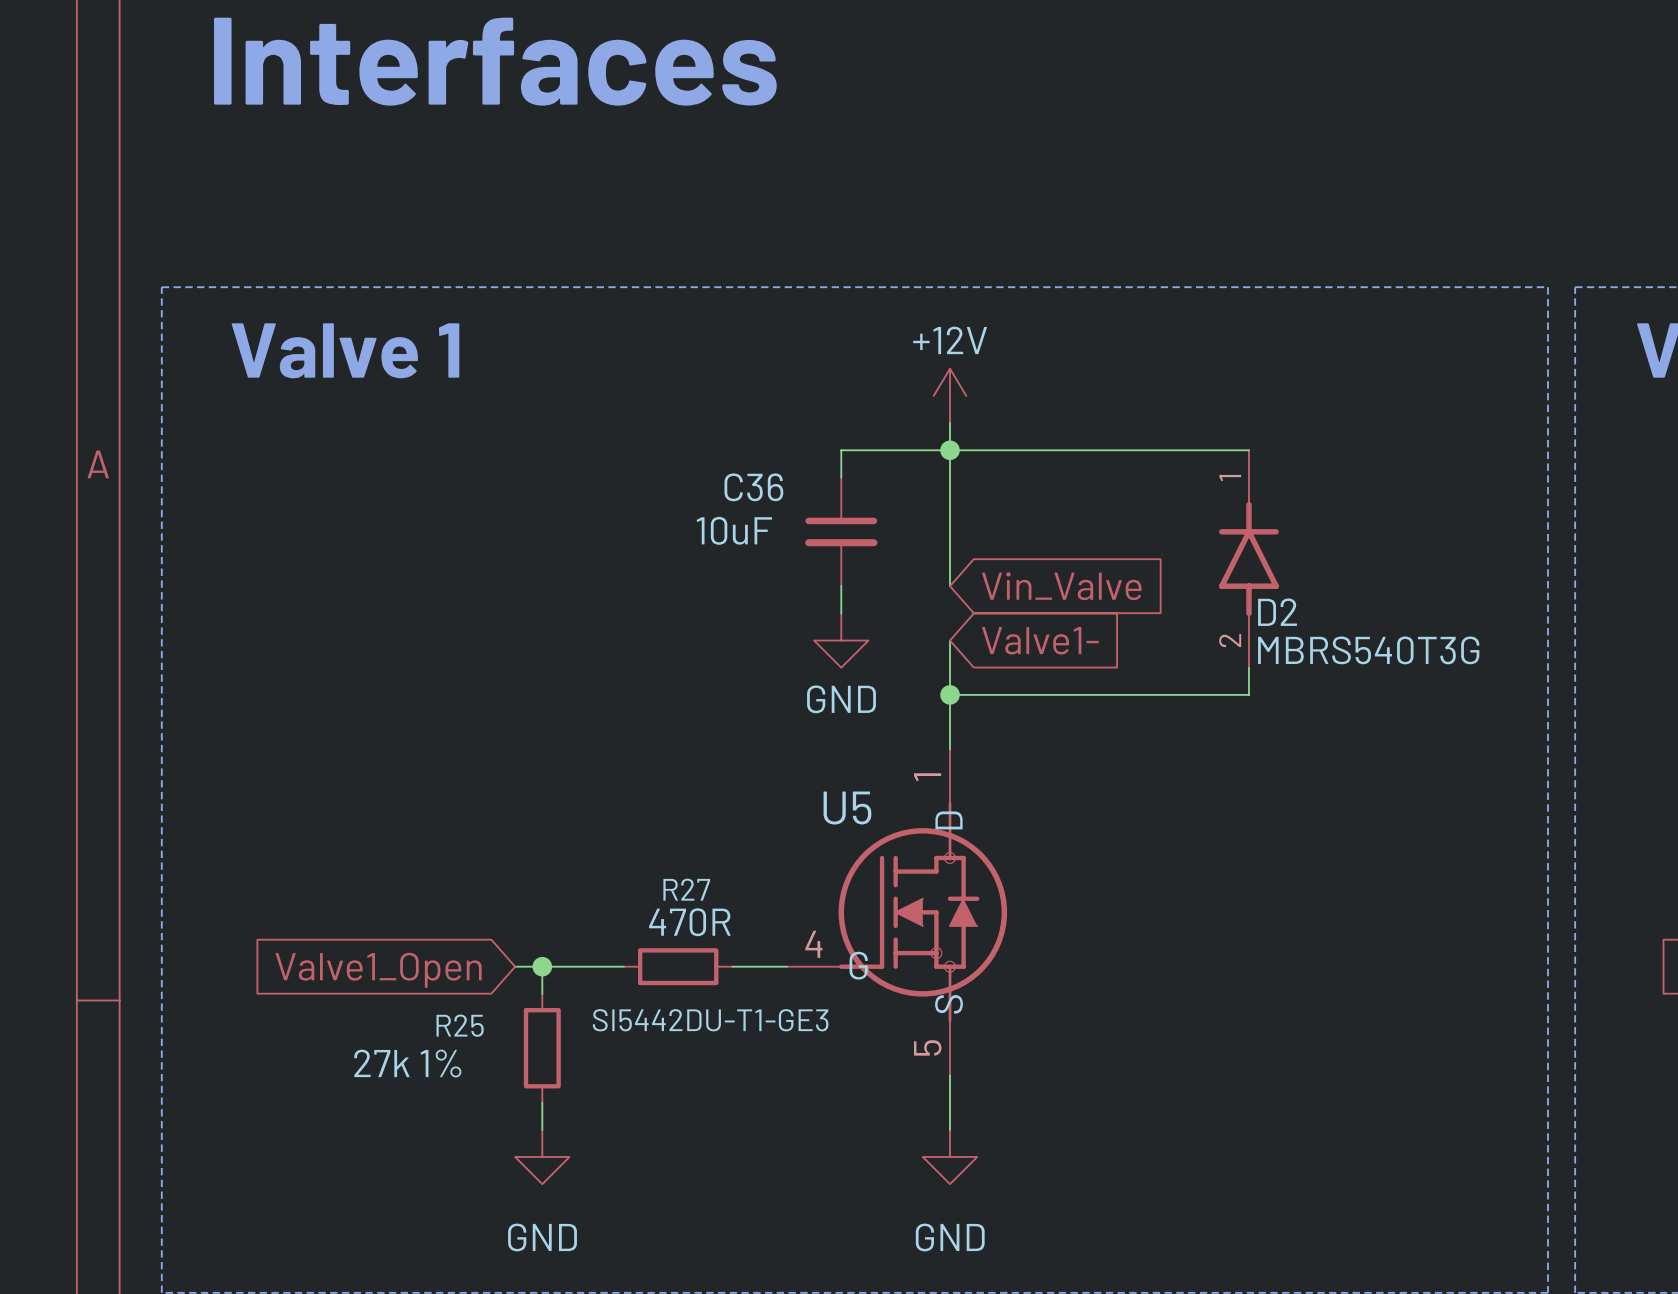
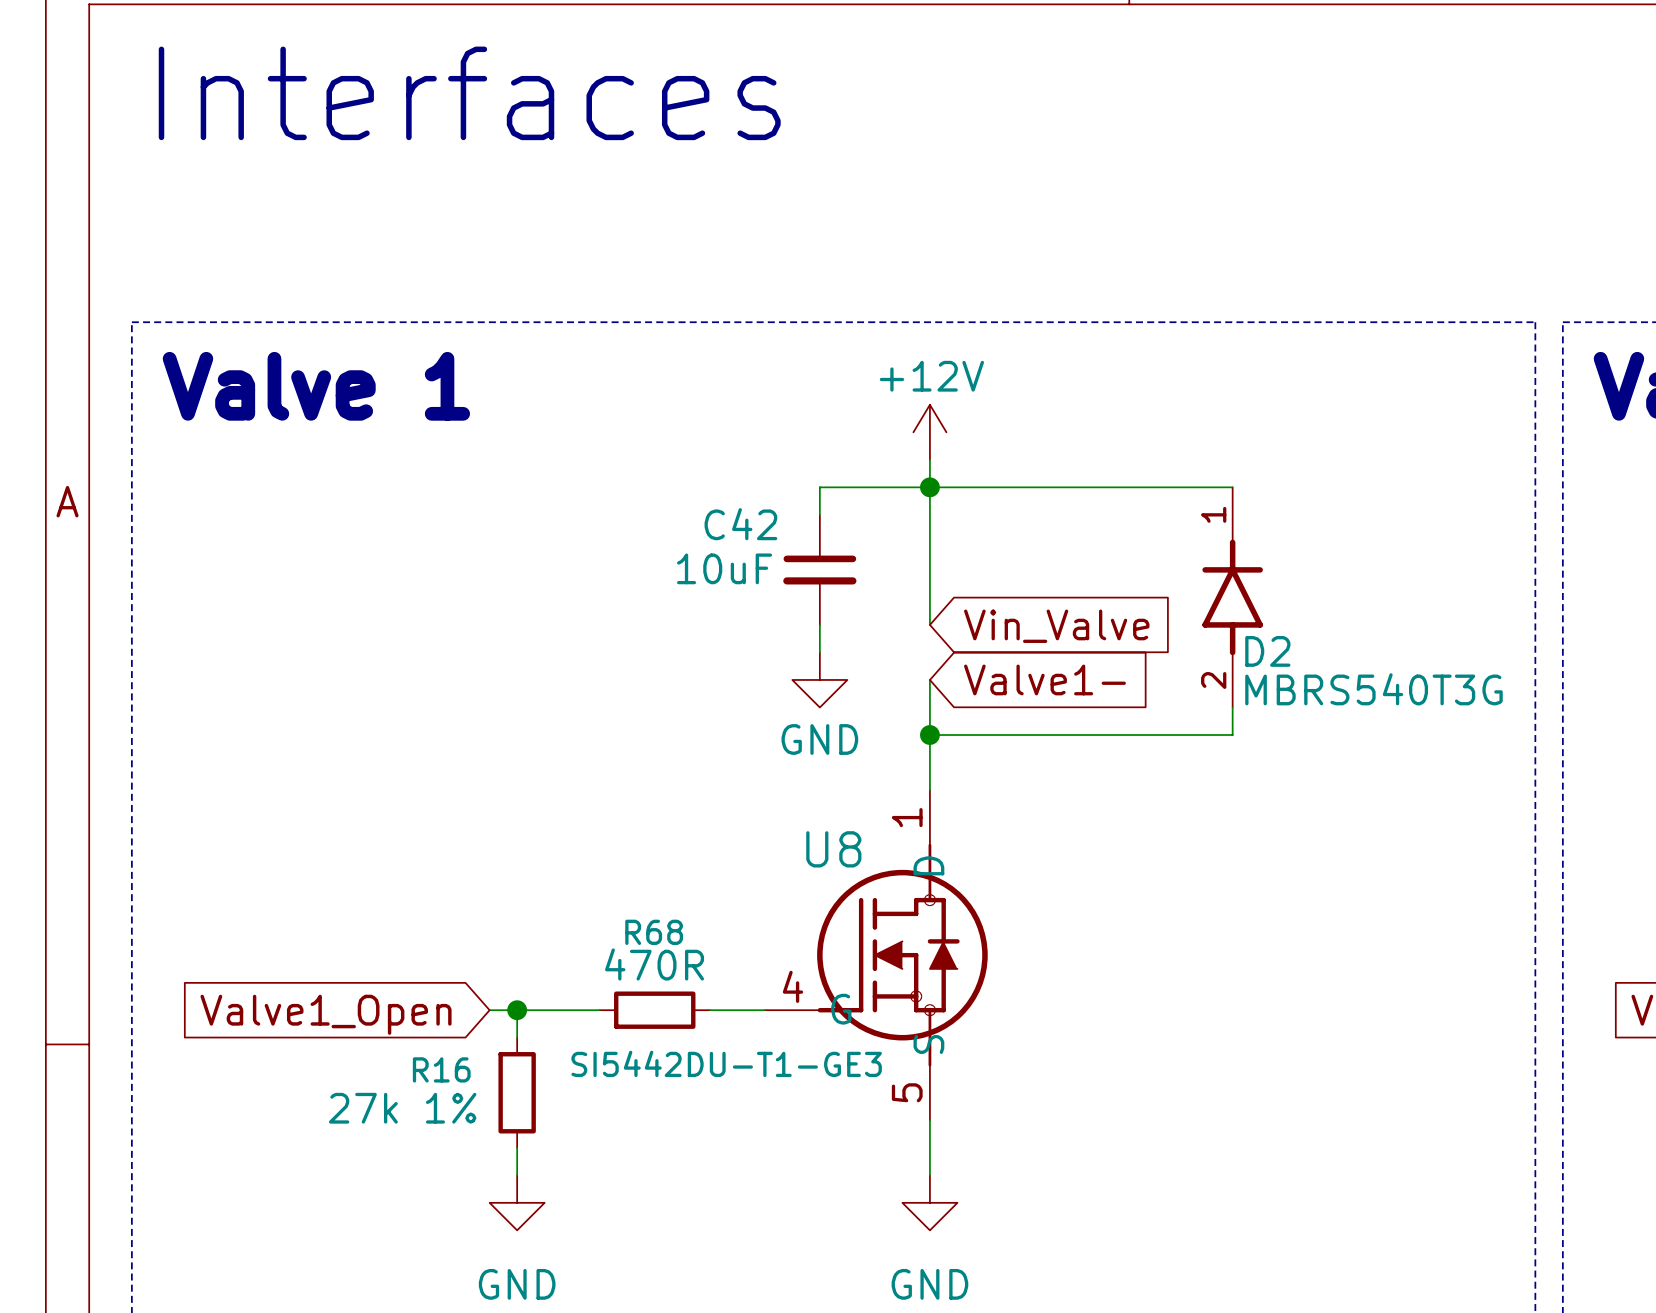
C36 name: C36 (753, 487) -> C42 (740, 524)
U5 name: U5 (847, 808) -> U8 (833, 849)
R27 name: R27 (686, 889) -> R68 (654, 932)
R25 name: R25 (460, 1025) -> R16 (441, 1069)

